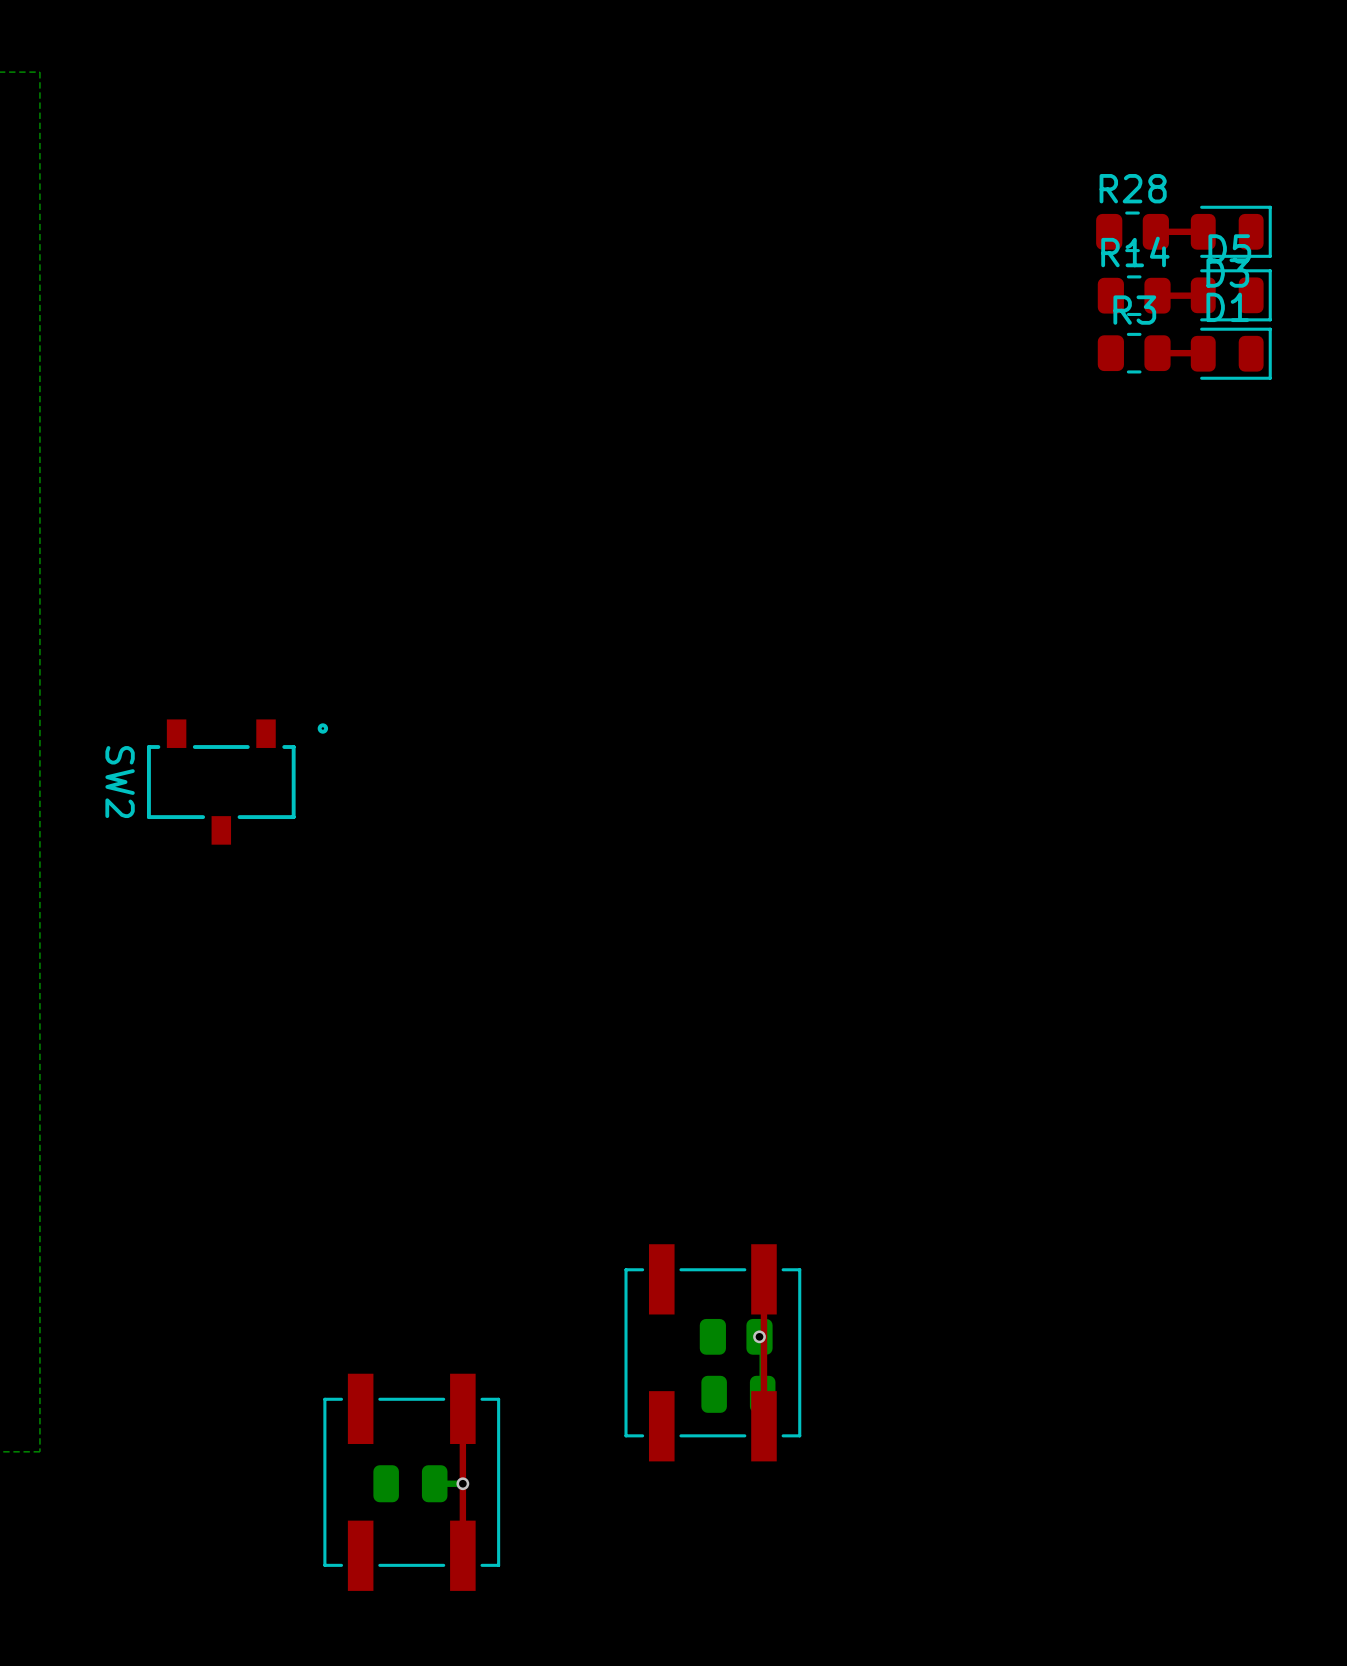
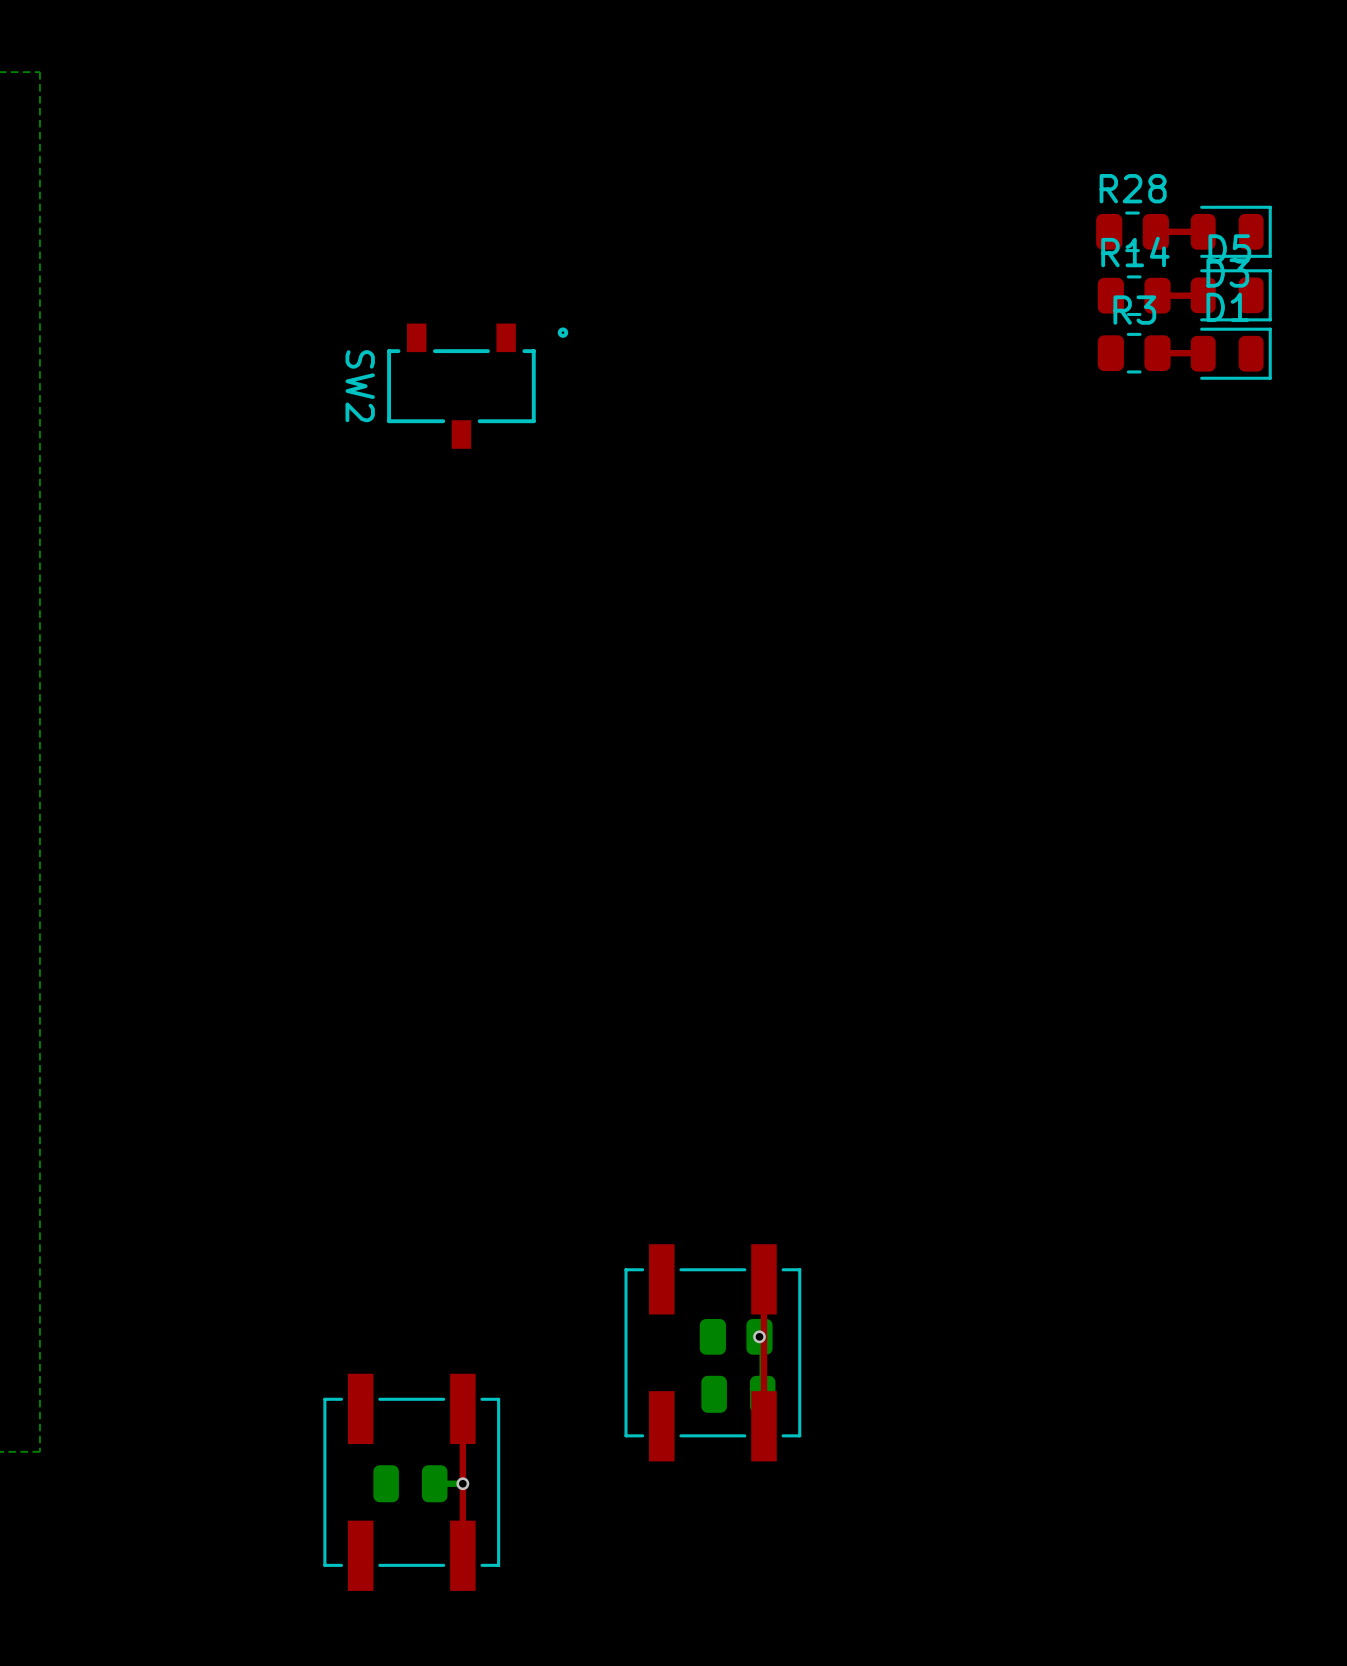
SW2 position: (237, 782) -> (477, 386)

